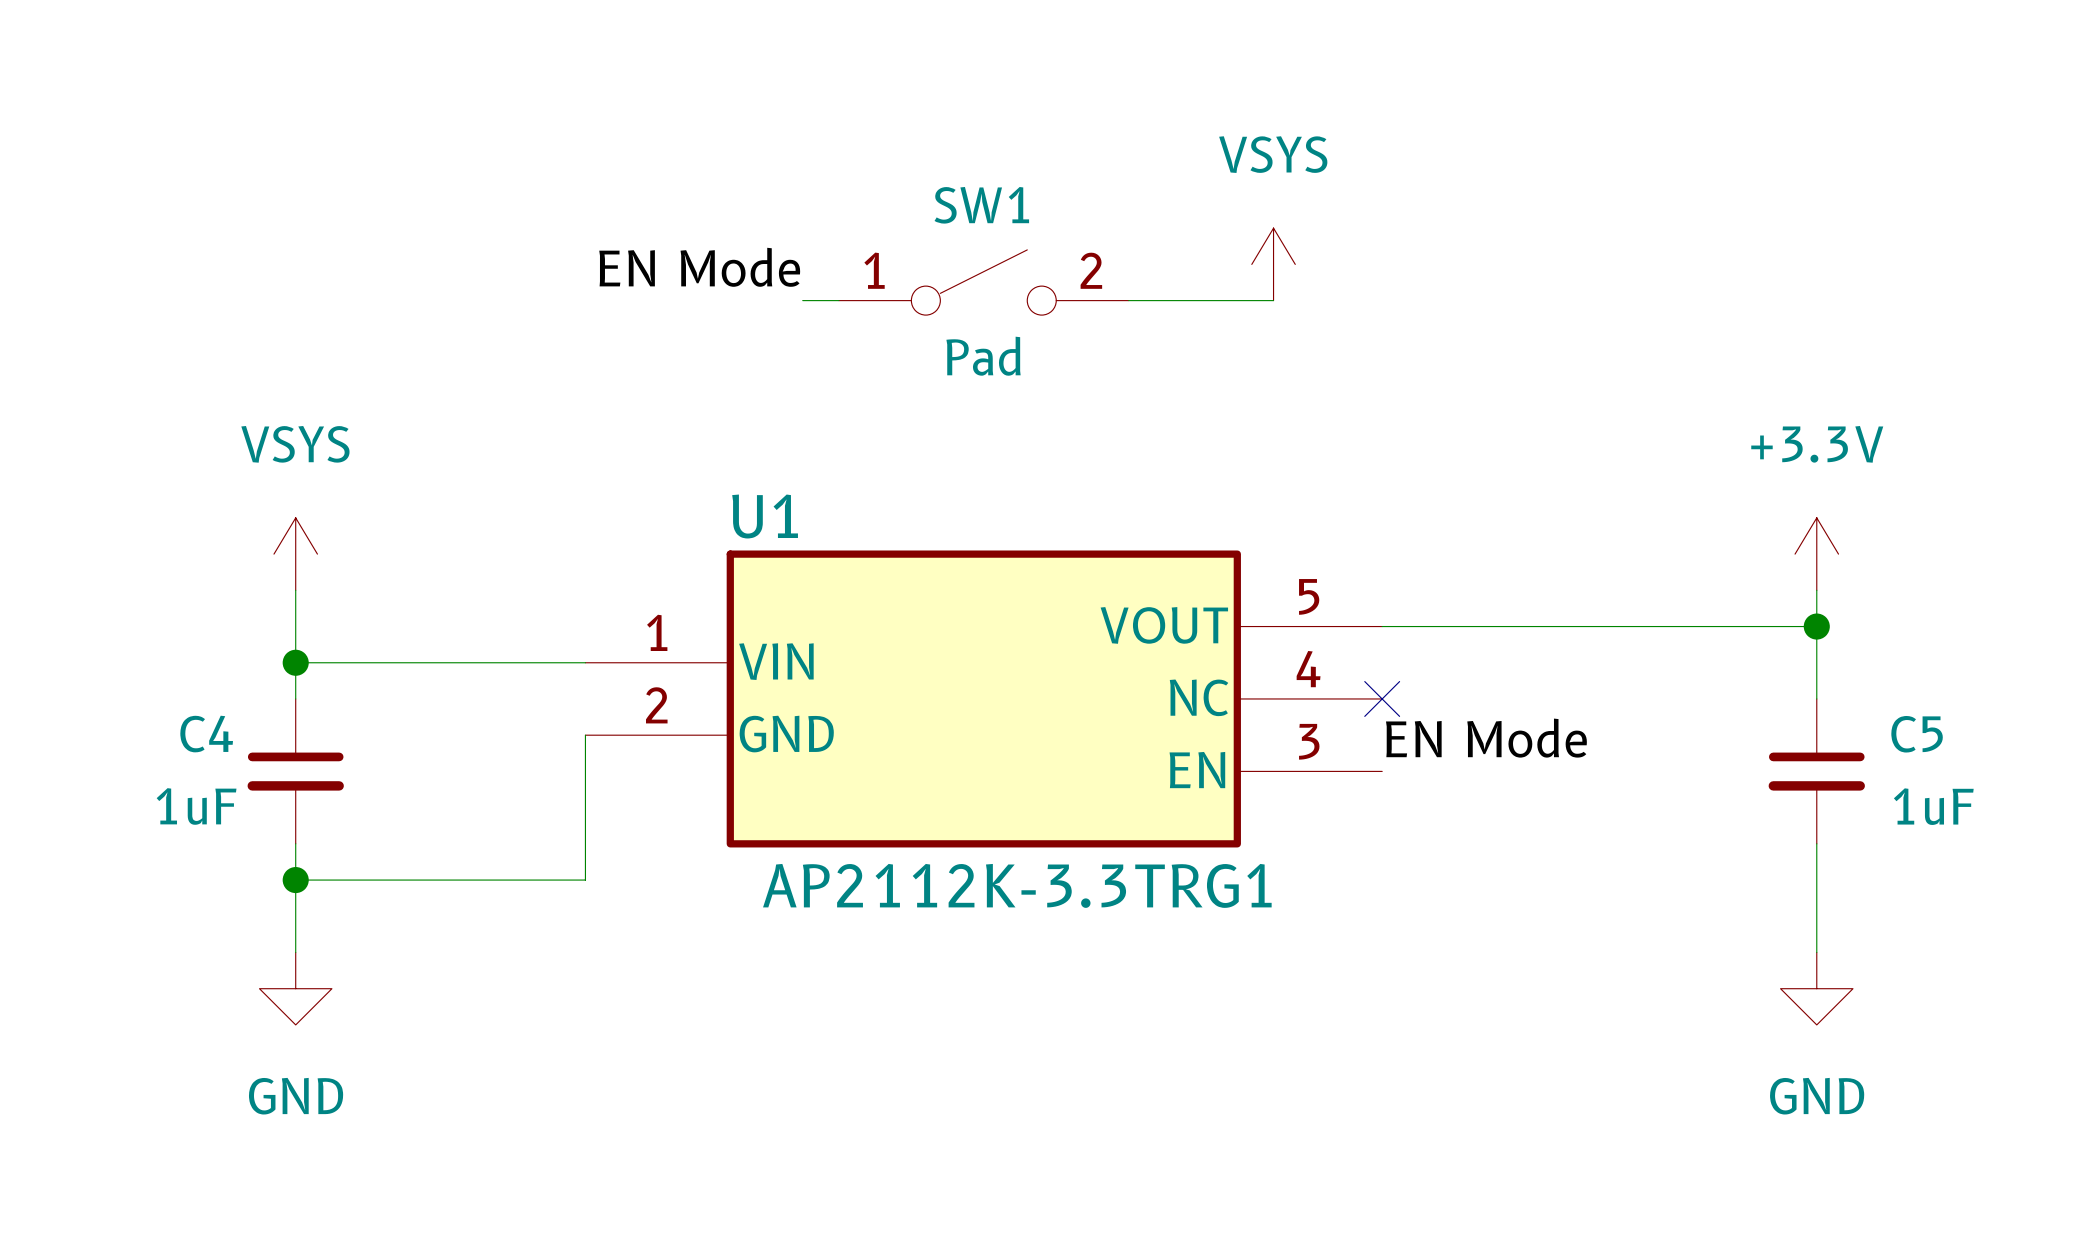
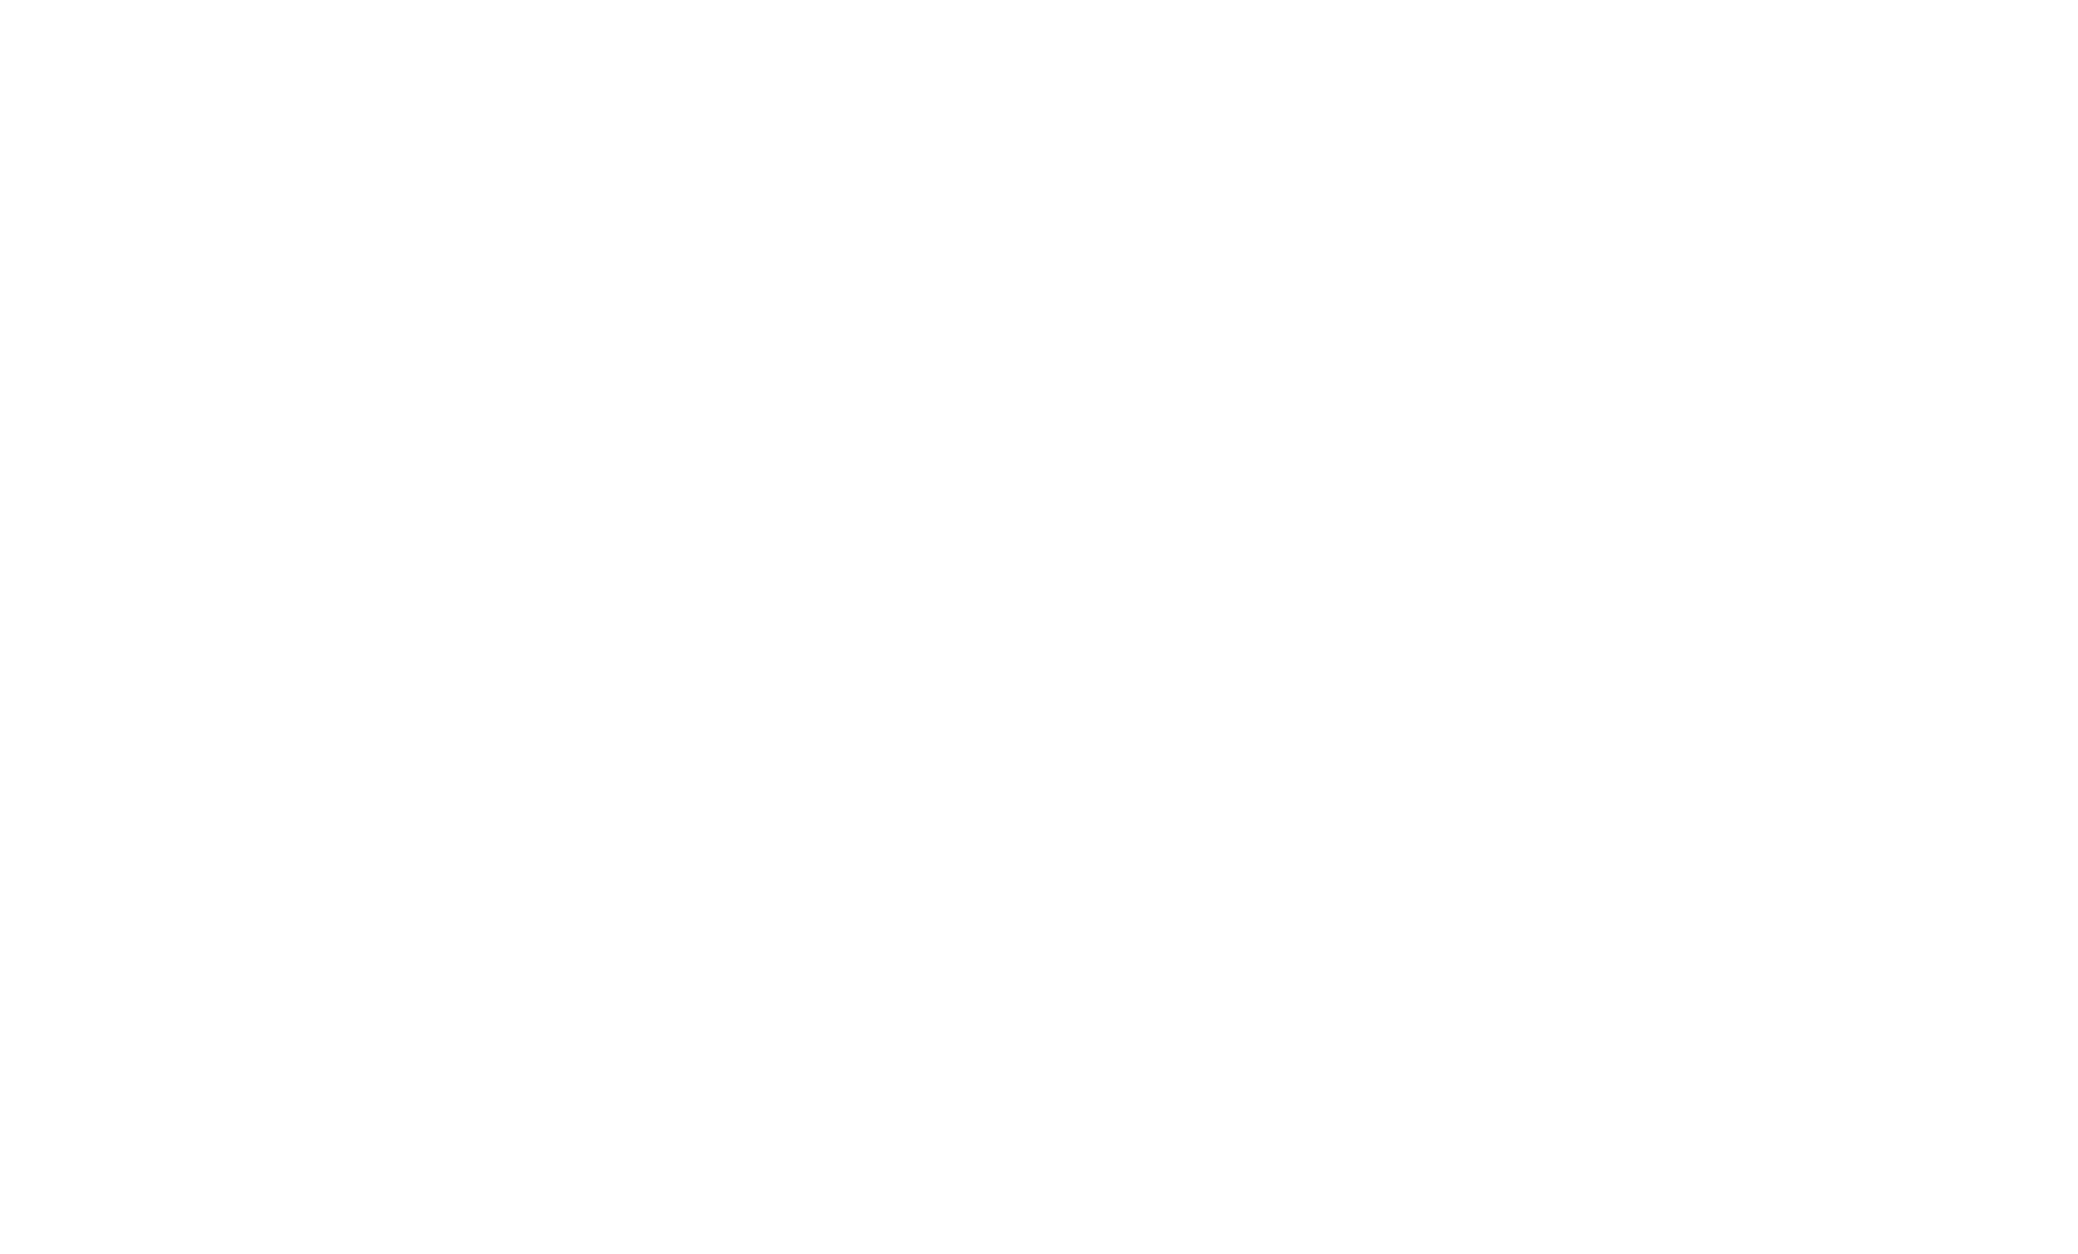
power symbol: VSYS (1273, 264) -> none
label: EN Mode (699, 267) -> none
SW1: Pad (983, 282) -> none
wire: (802, 300) (838, 300) -> none
wire: (1128, 300) (1273, 300) -> none
power symbol: VSYS (295, 554) -> none
power symbol: +3.3V (1816, 554) -> none
wire: (295, 590) (295, 698) -> none
wire: (1816, 590) (1816, 698) -> none
wire: (1382, 626) (1816, 626) -> none
junction: (1816, 626) -> none
wire: (295, 662) (585, 662) -> none
junction: (295, 662) -> none
U1: AP2112K-3.3TRG1 (983, 698) -> none
no-connect mark: (1382, 698) -> none
wire: (585, 735) (585, 880) (295, 880) -> none
label: EN Mode (1486, 738) -> none
C4: 1uF (295, 771) -> none
C5: 1uF (1816, 771) -> none
wire: (295, 843) (295, 952) -> none
wire: (1816, 843) (1816, 952) -> none
junction: (295, 880) -> none
power symbol: GND (295, 988) -> none
power symbol: GND (1816, 988) -> none

